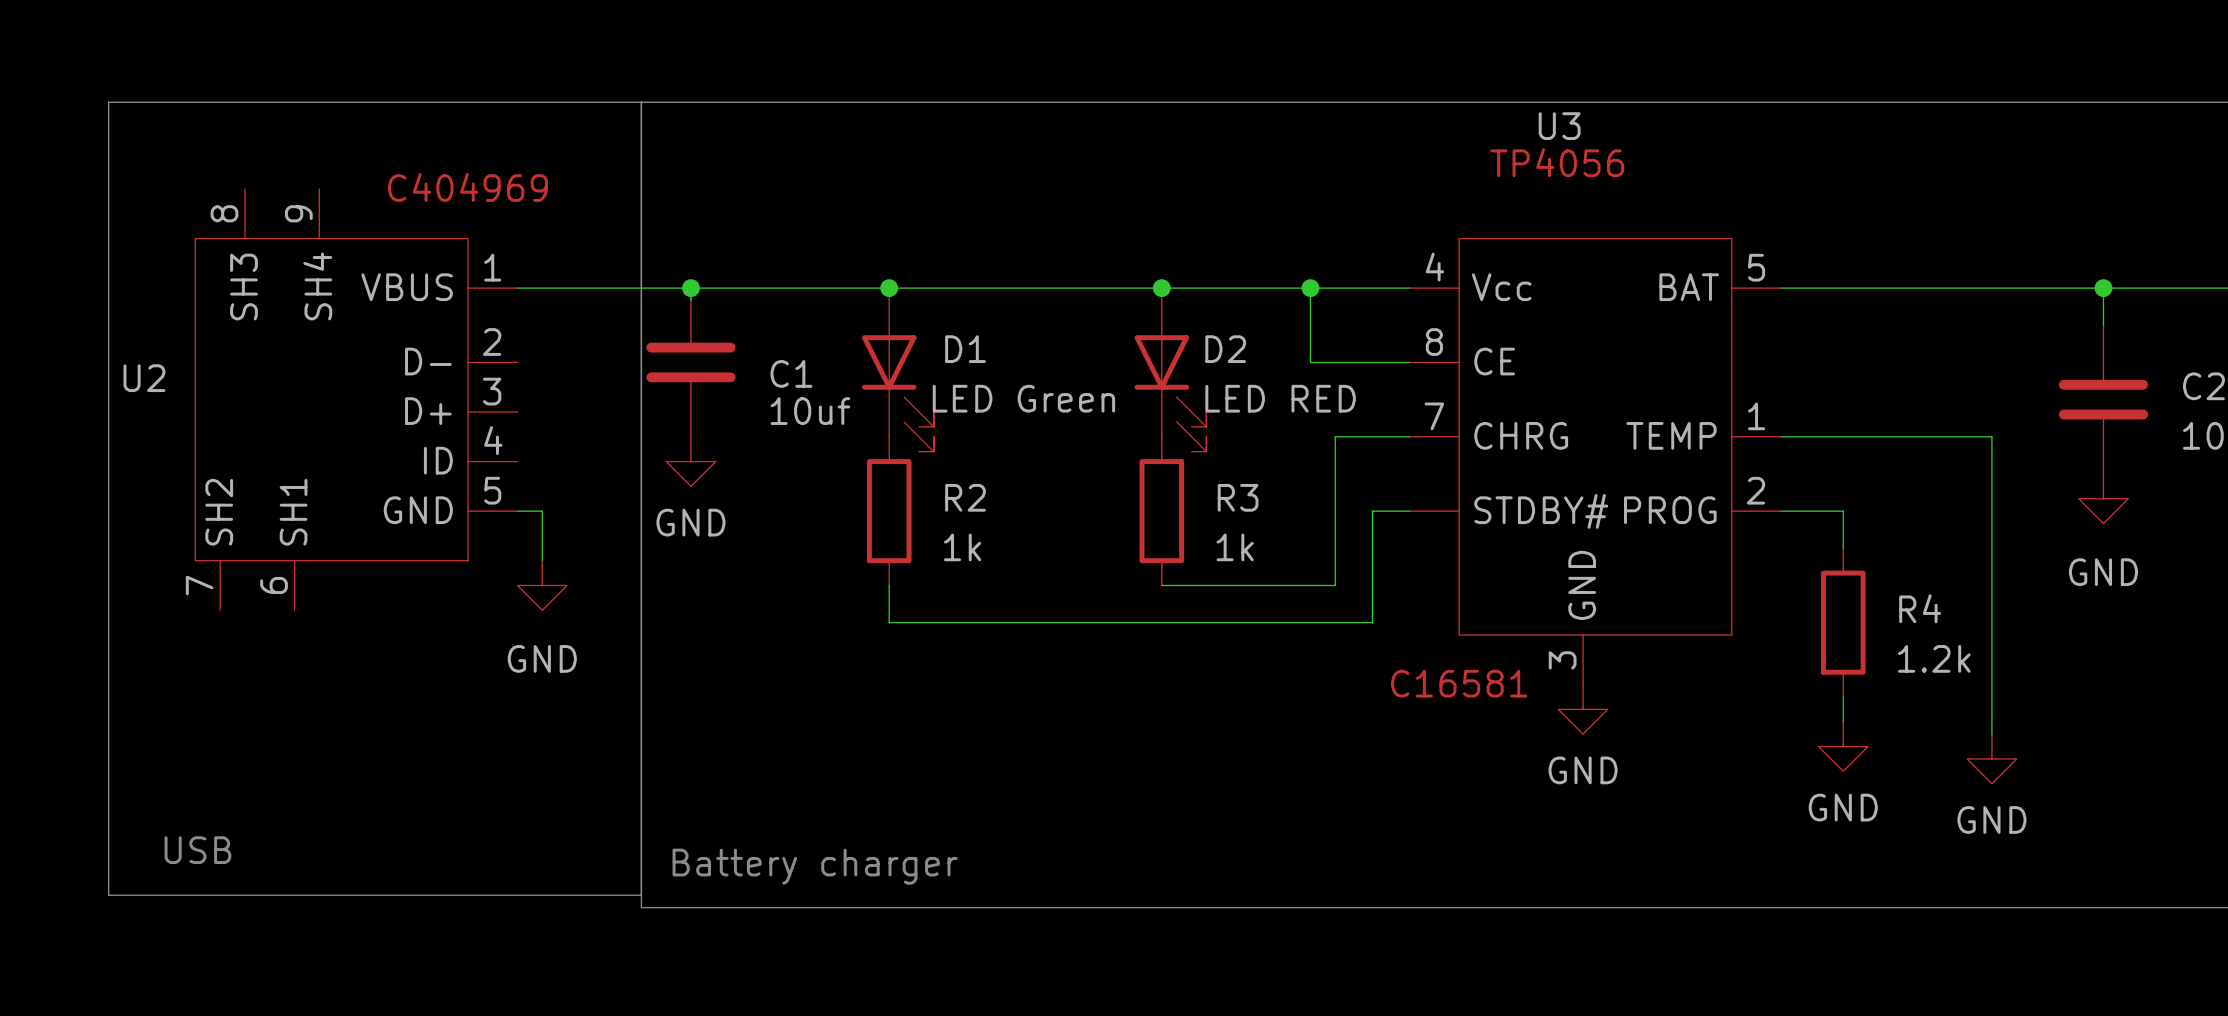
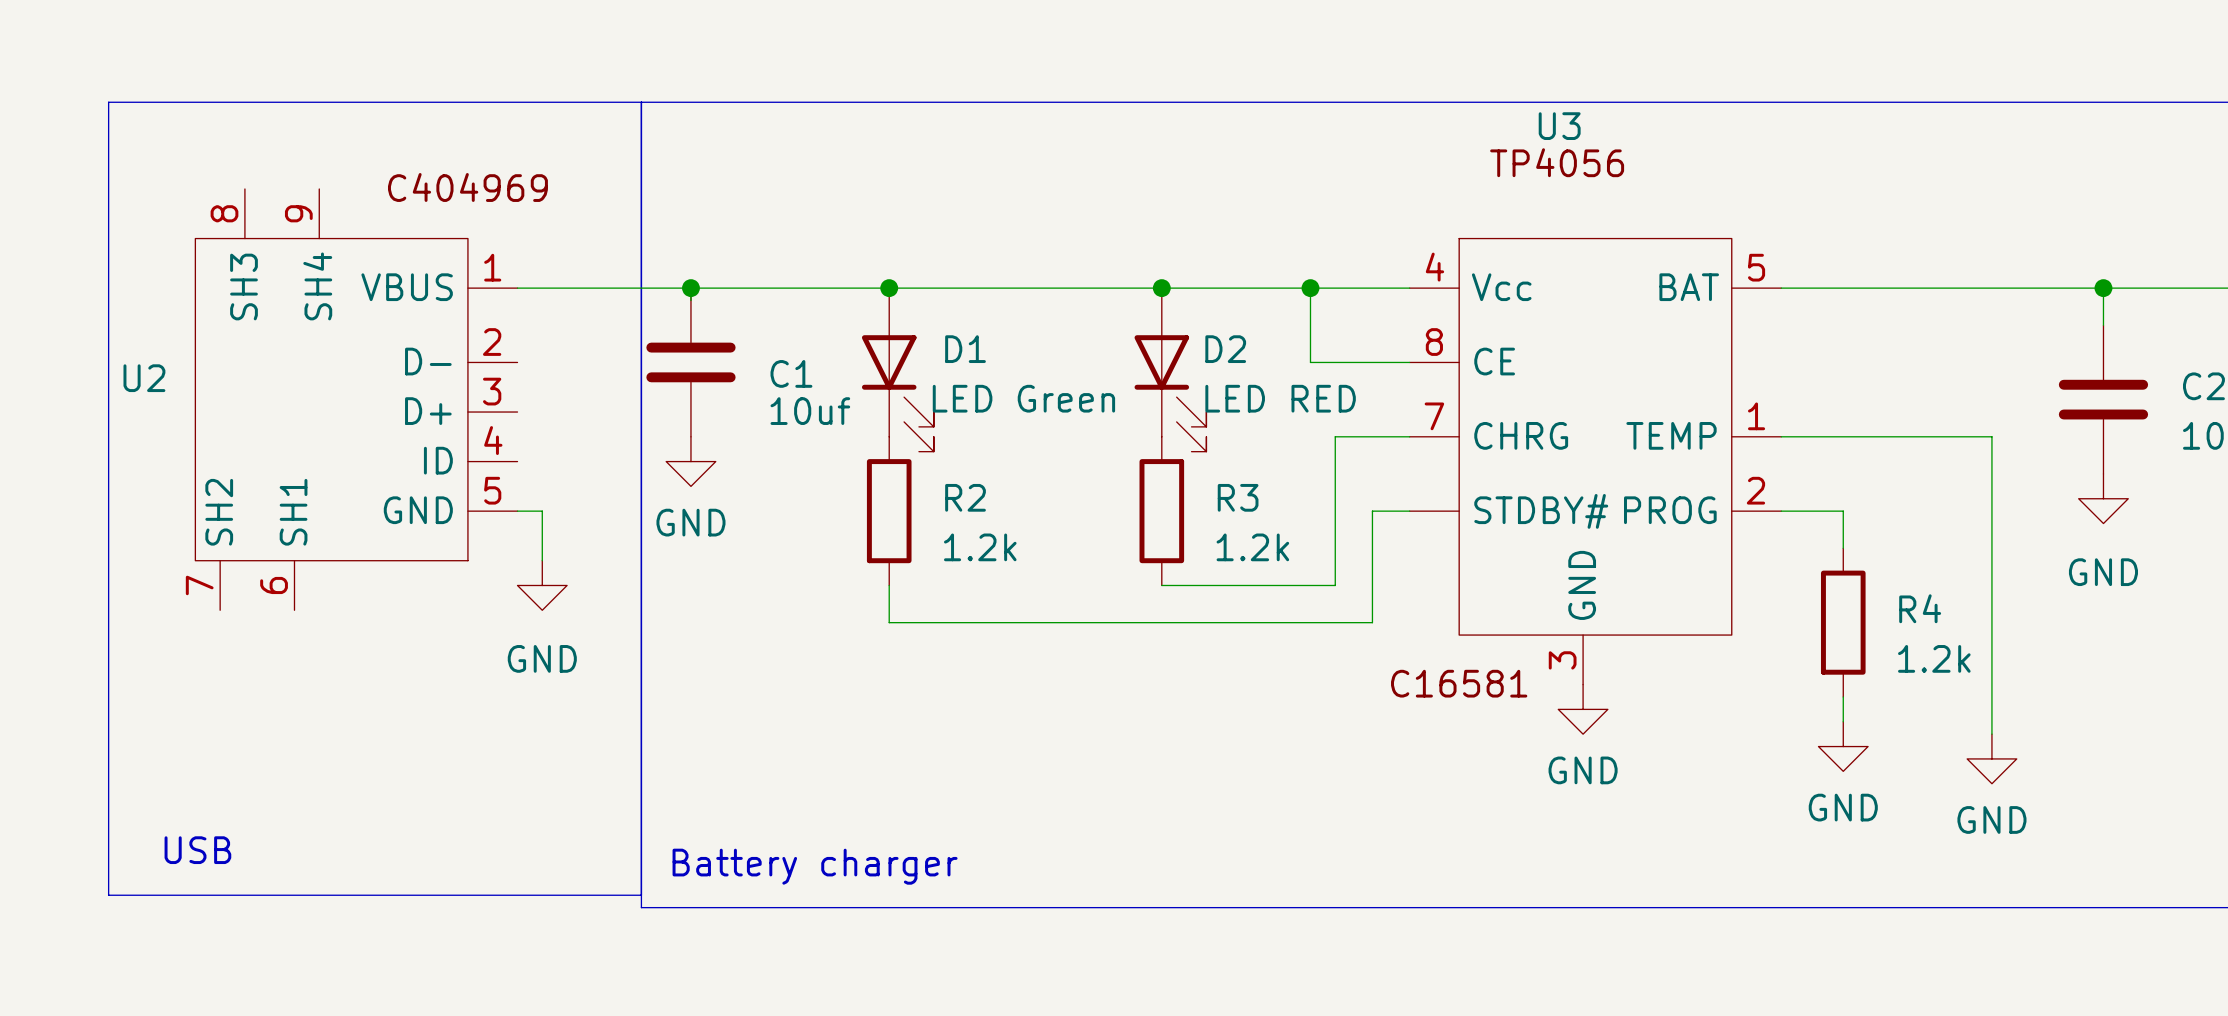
R2 value: 1k (962, 547) -> 1.2k (980, 547)
R3 value: 1k (1235, 547) -> 1.2k (1252, 547)

